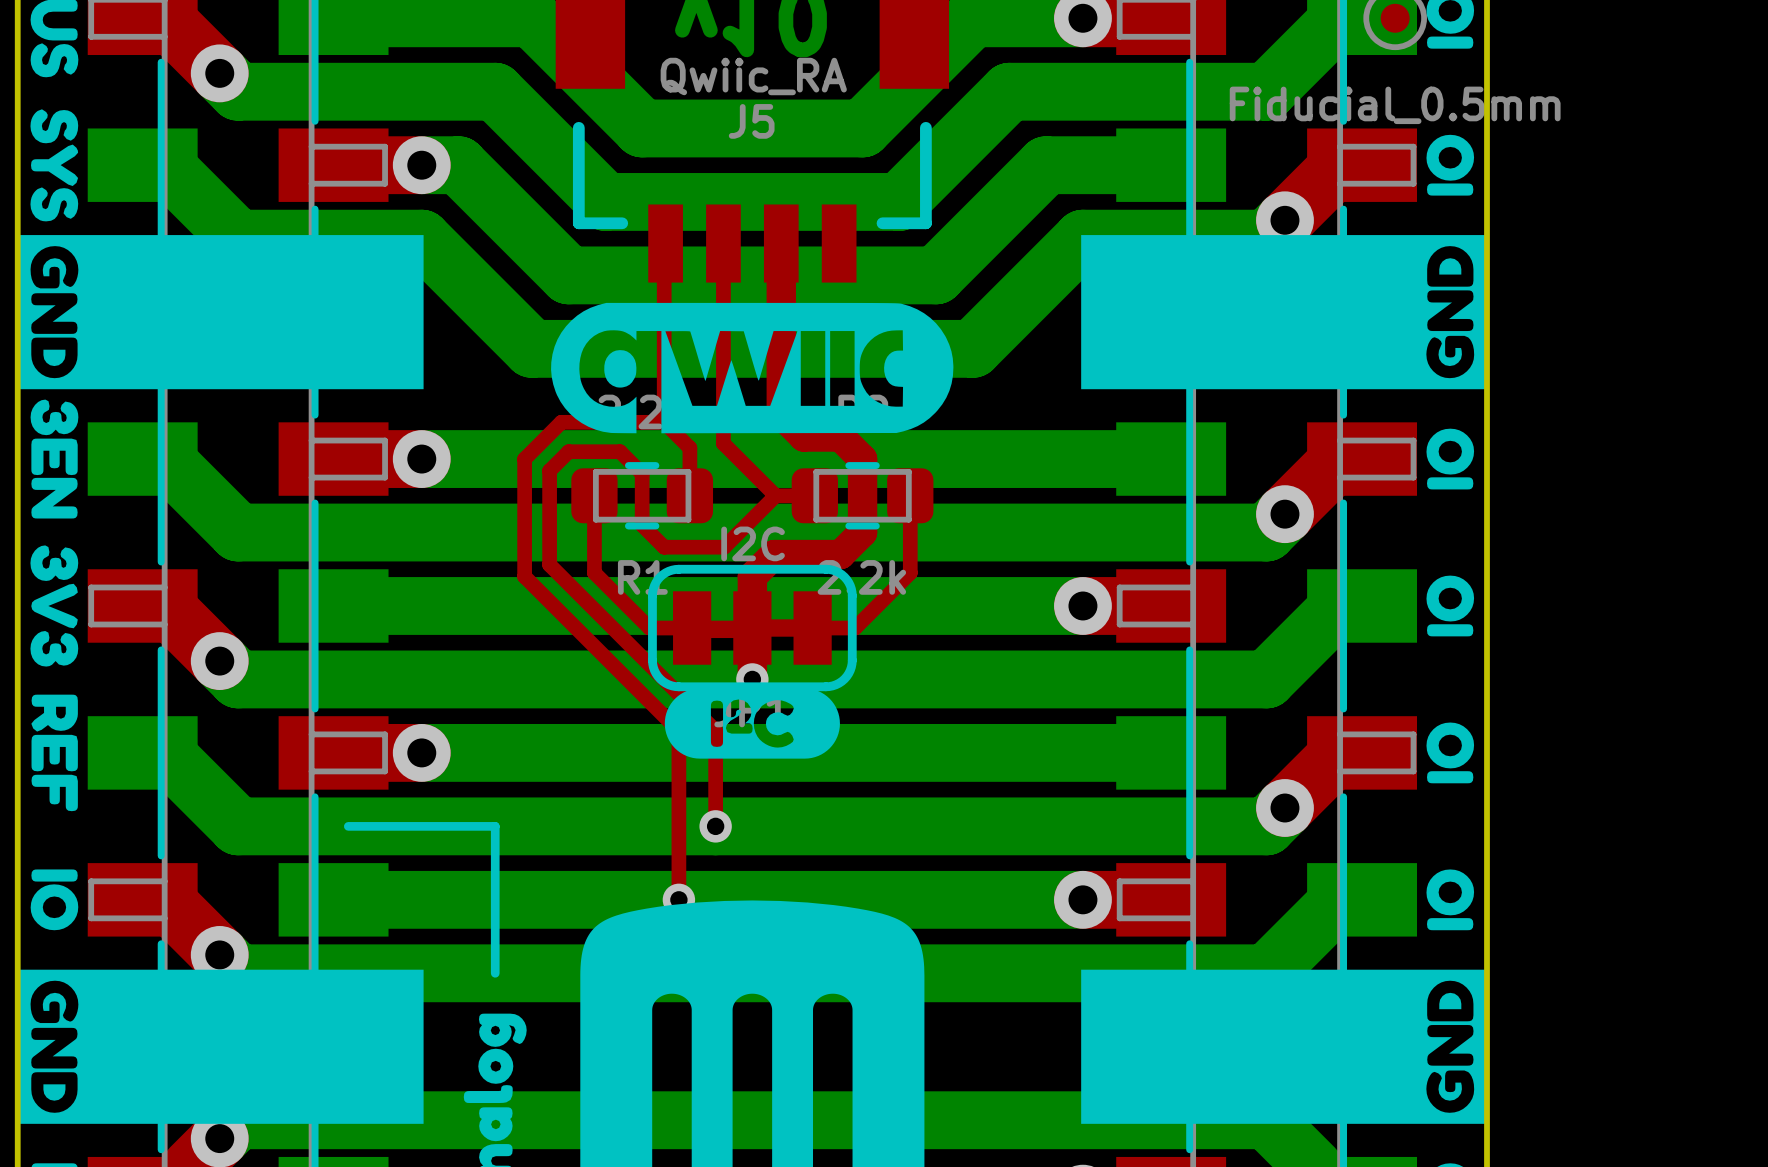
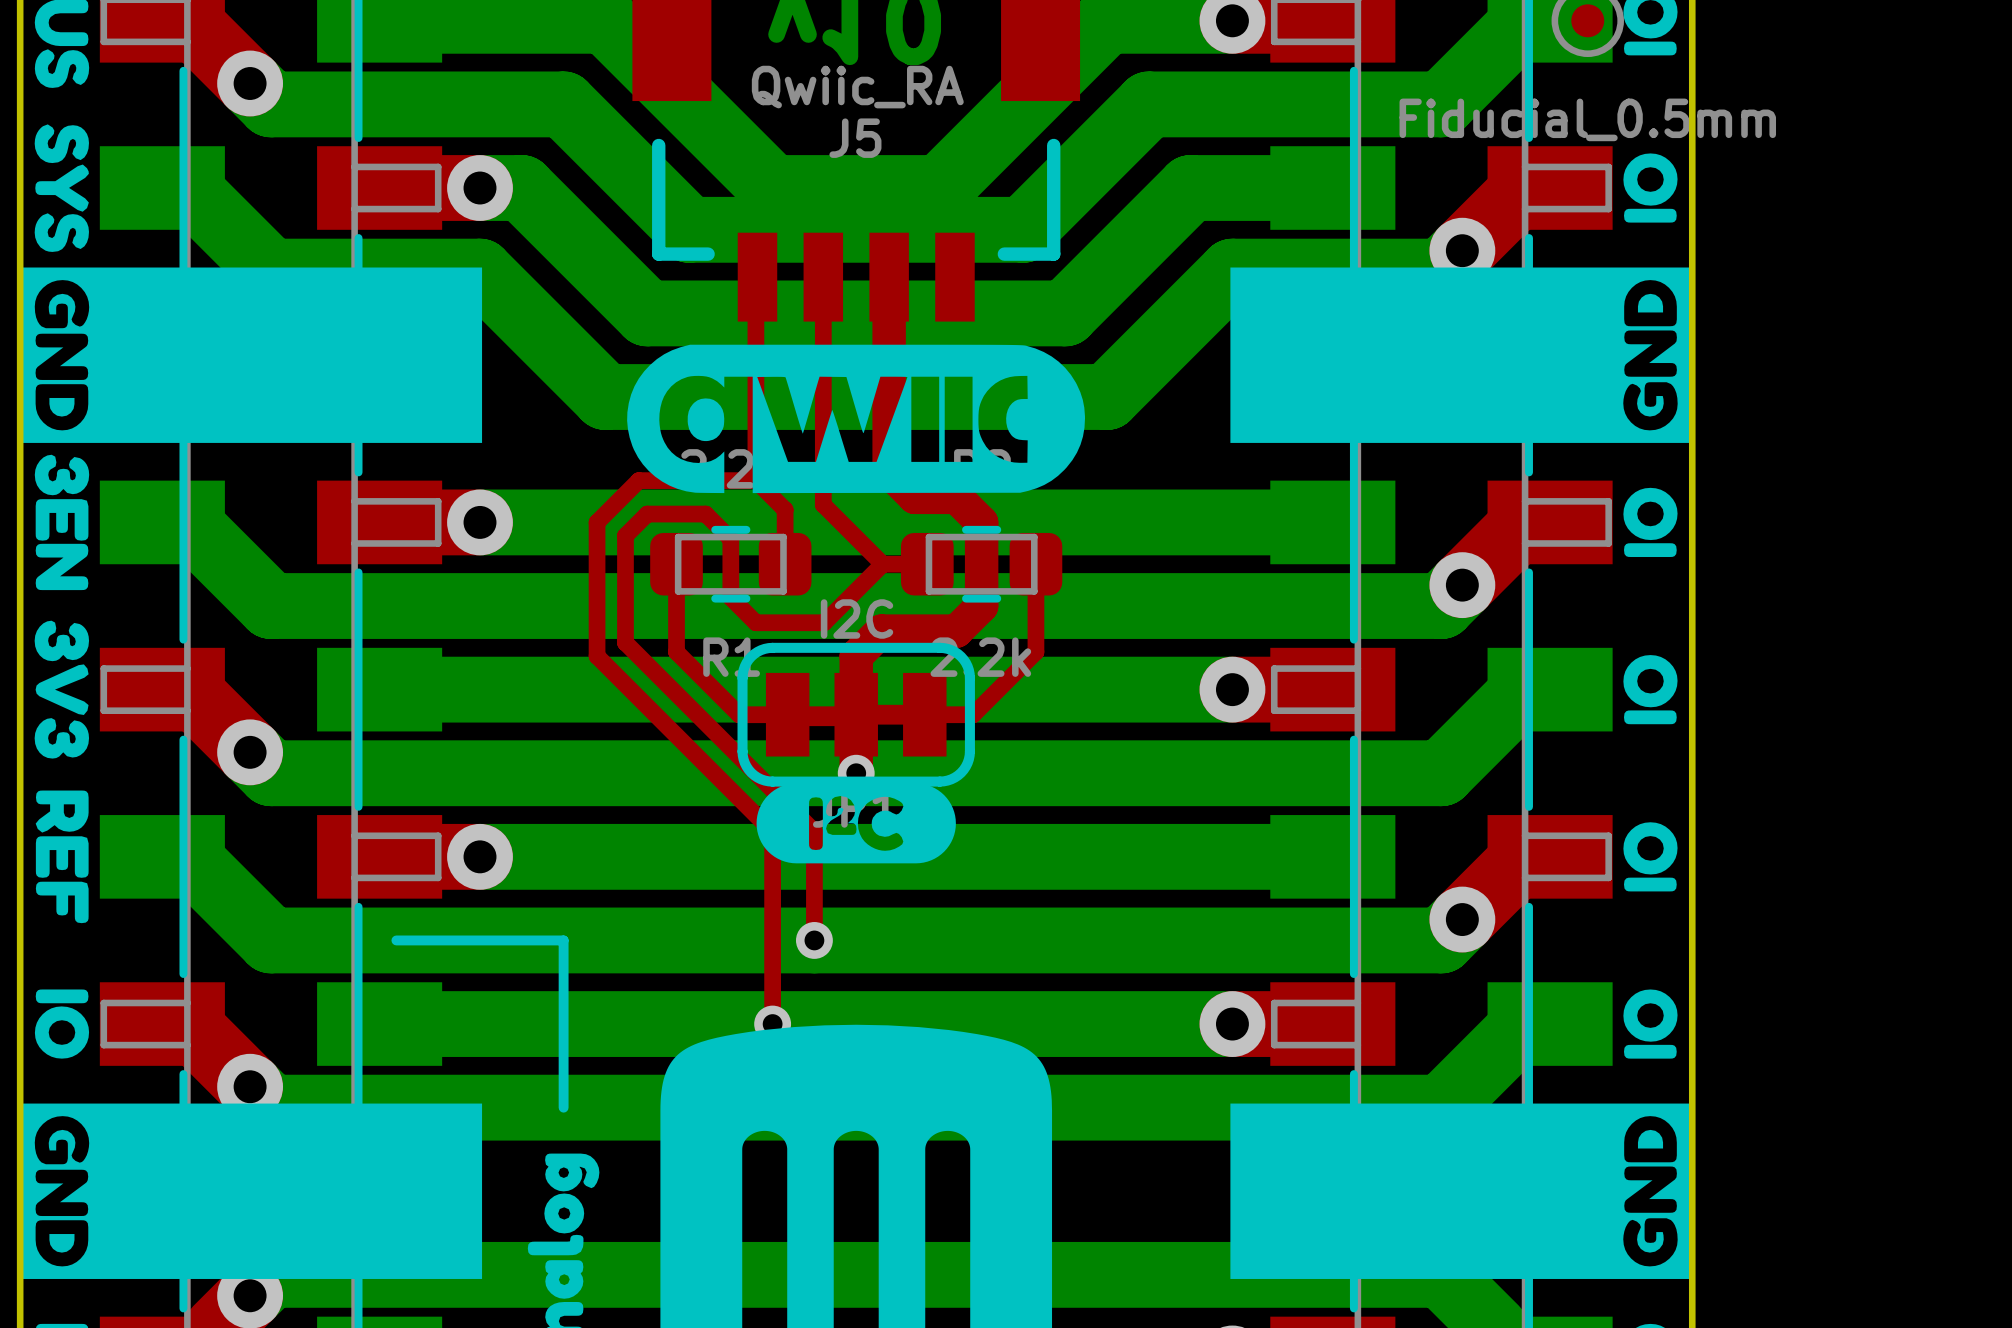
bottom track: (642, 128) (862, 128) -> (730, 146) (772, 188) (939, 188) (981, 146)

